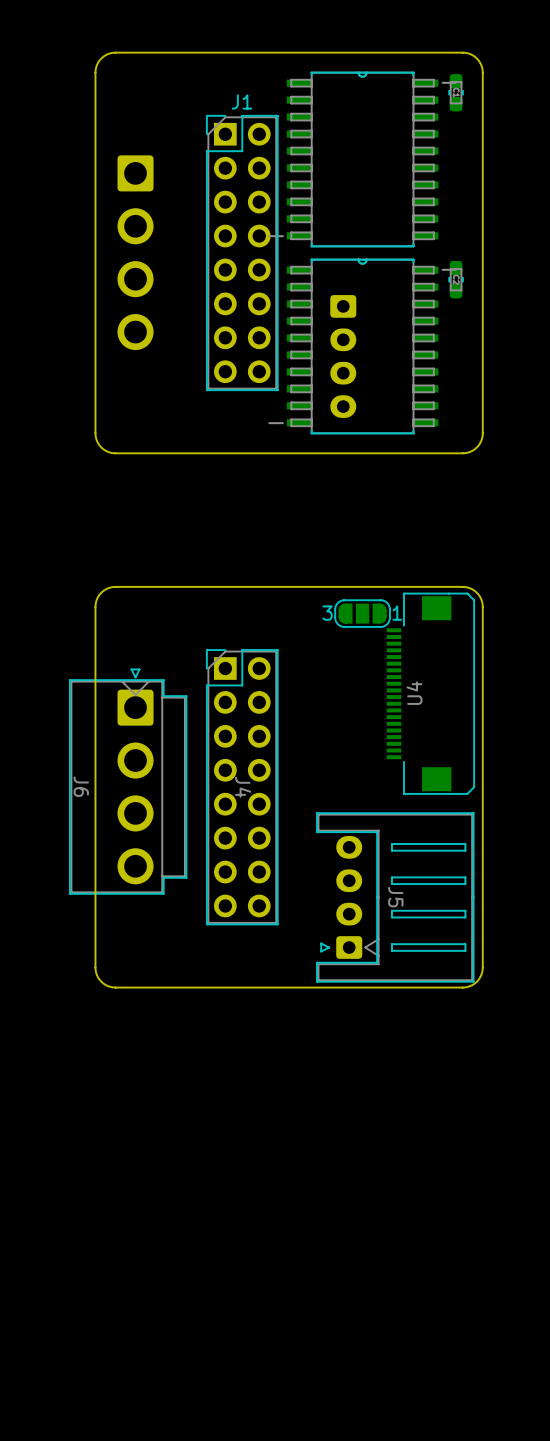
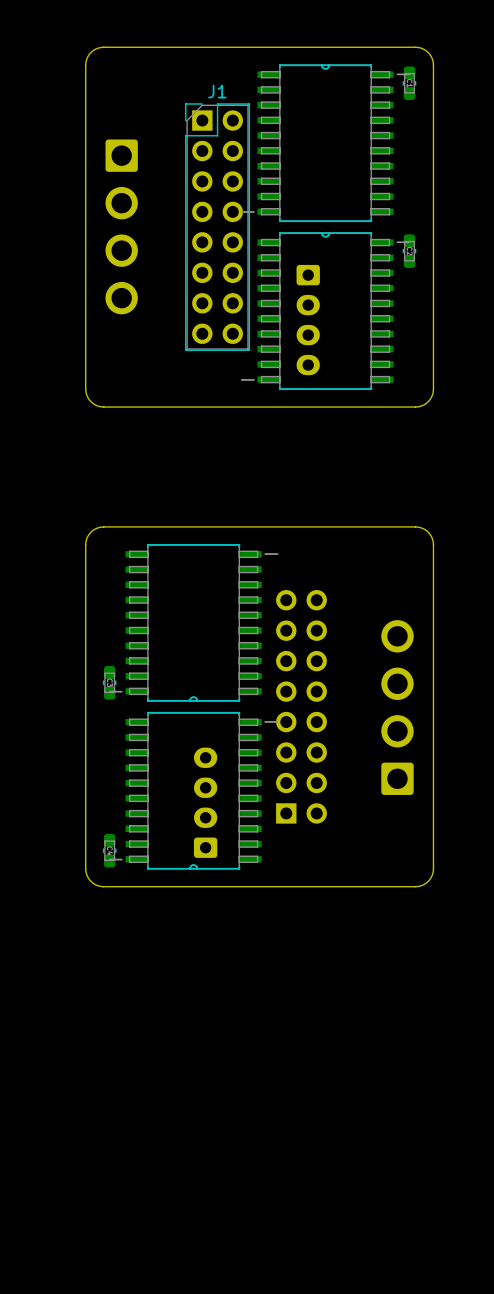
part: (362, 613) -> none
part: none -> (193, 622)
U4: (430, 693) -> none
part: none -> (109, 682)
J6 side: bottom (128, 781) -> top (397, 707)
J4 side: bottom (242, 787) -> top (301, 706)
part: none -> (193, 790)
J5 side: bottom (395, 897) -> top (205, 802)
part: none -> (109, 850)

